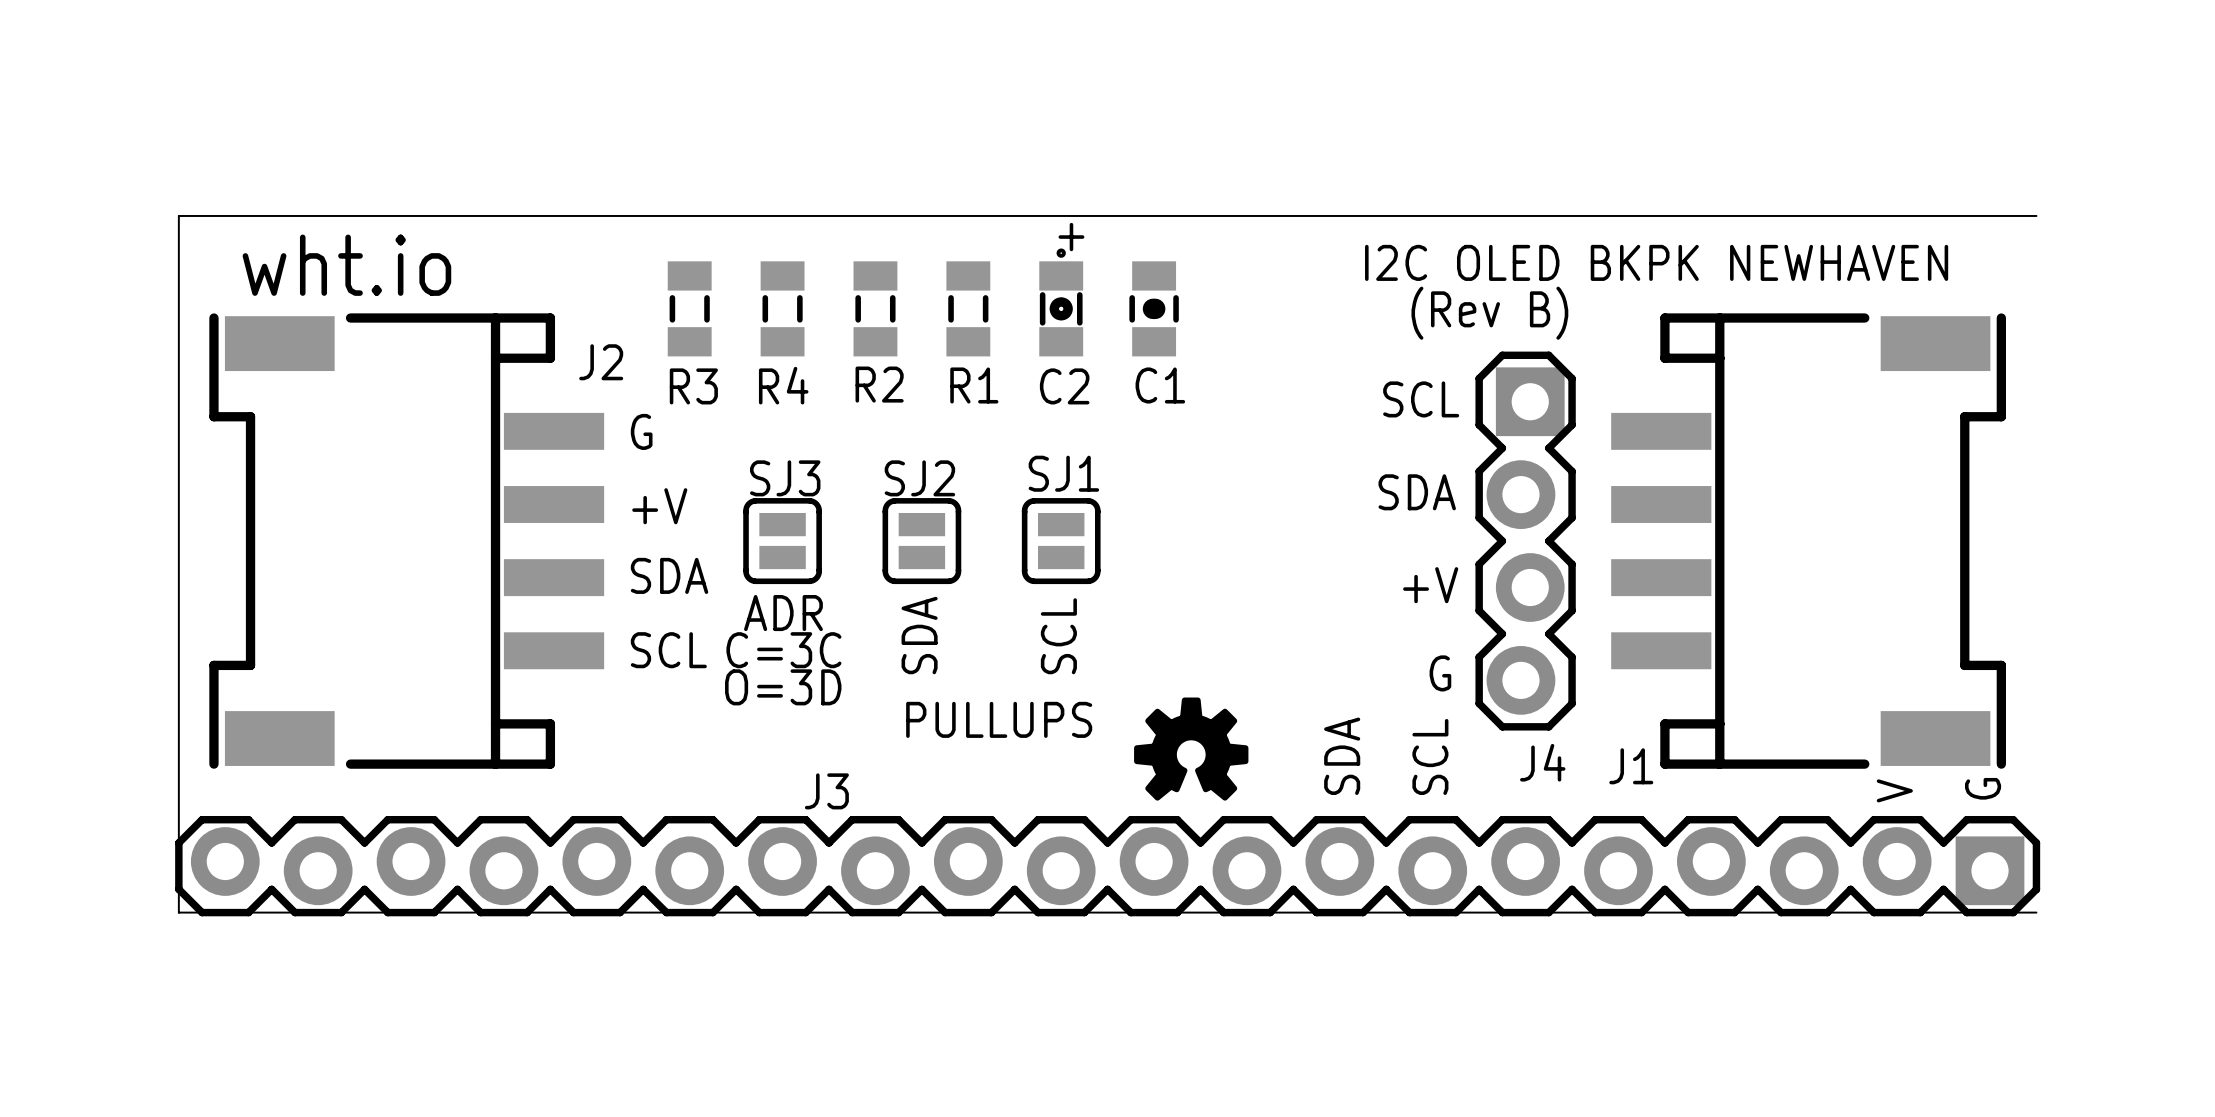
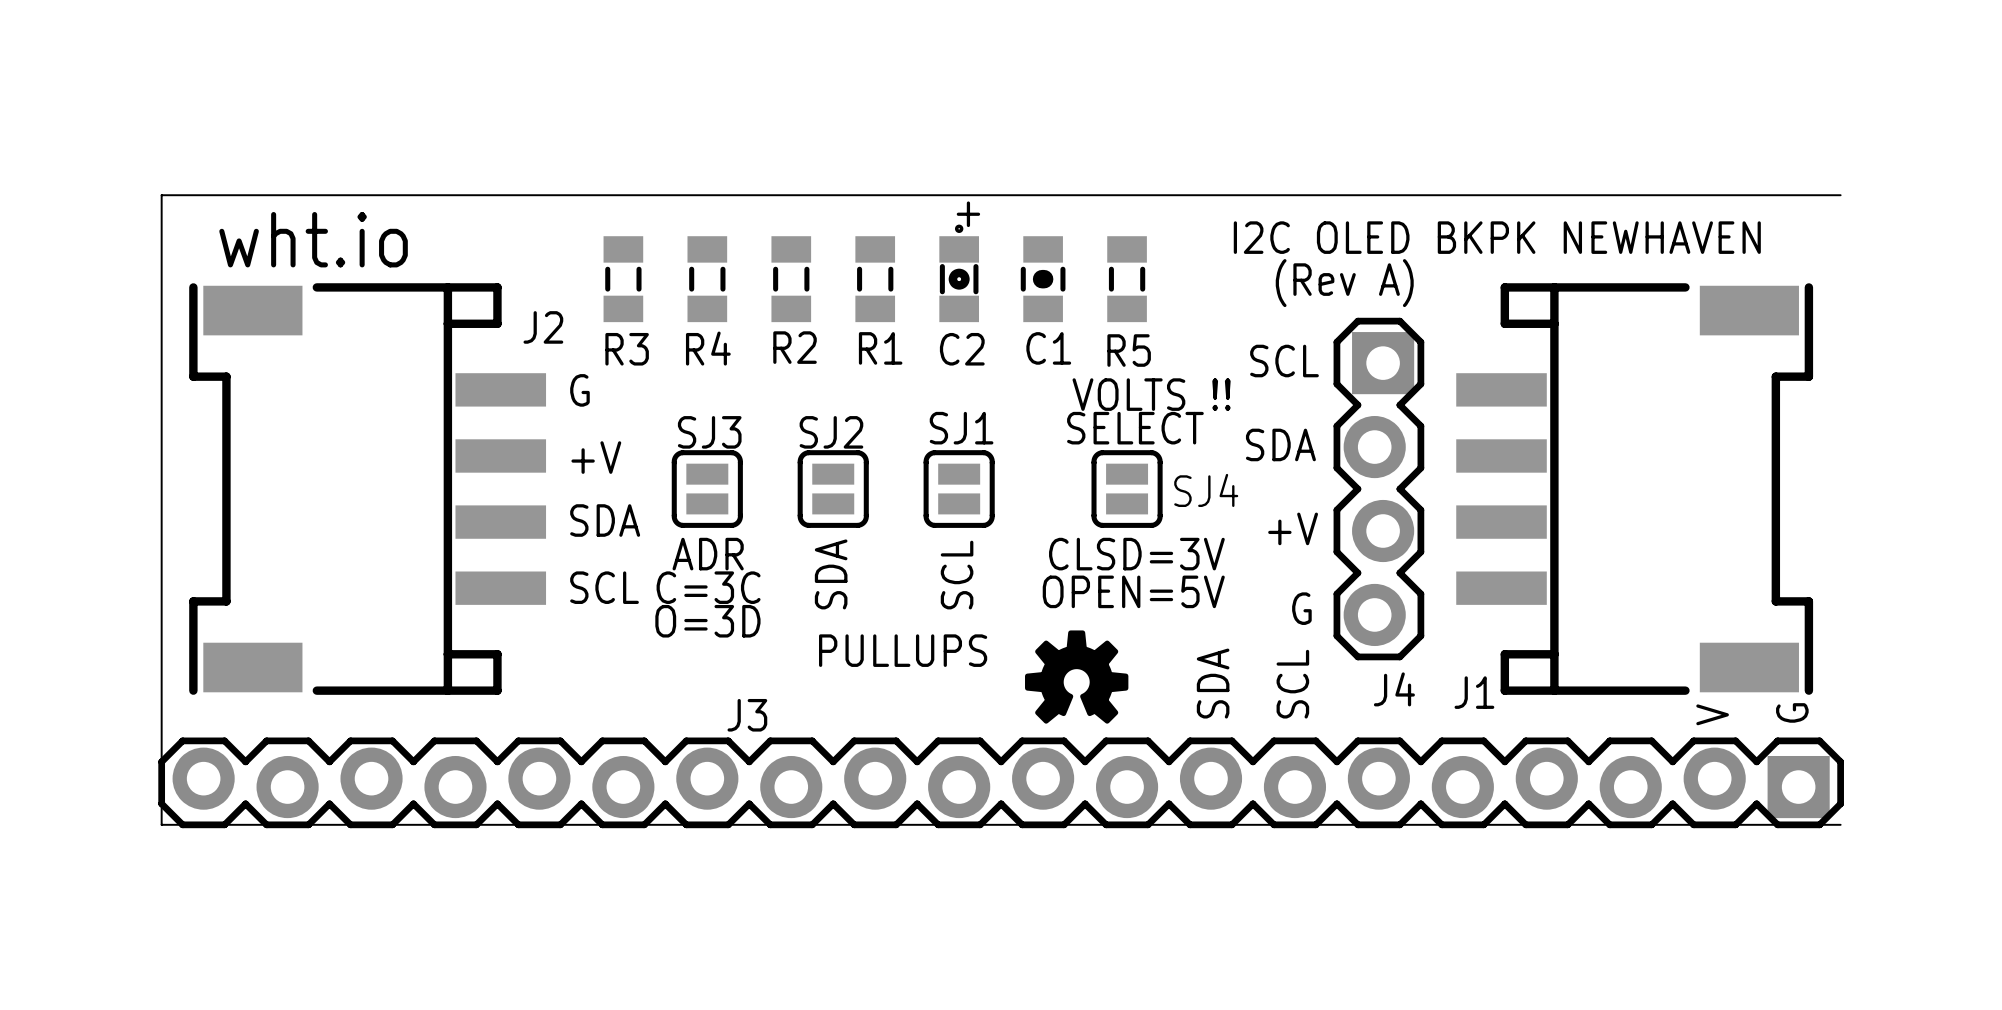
R5: none -> (1127, 279)
text: (Rev B) (1489, 313) -> (Rev A) (1344, 283)
text: none -> VOLTS !! (1151, 394)
text: none -> SELECT (1135, 428)
SJ4: none -> (1127, 489)
text: none -> CLSD=3V (1136, 554)
text: none -> OPEN=5V (1133, 591)

